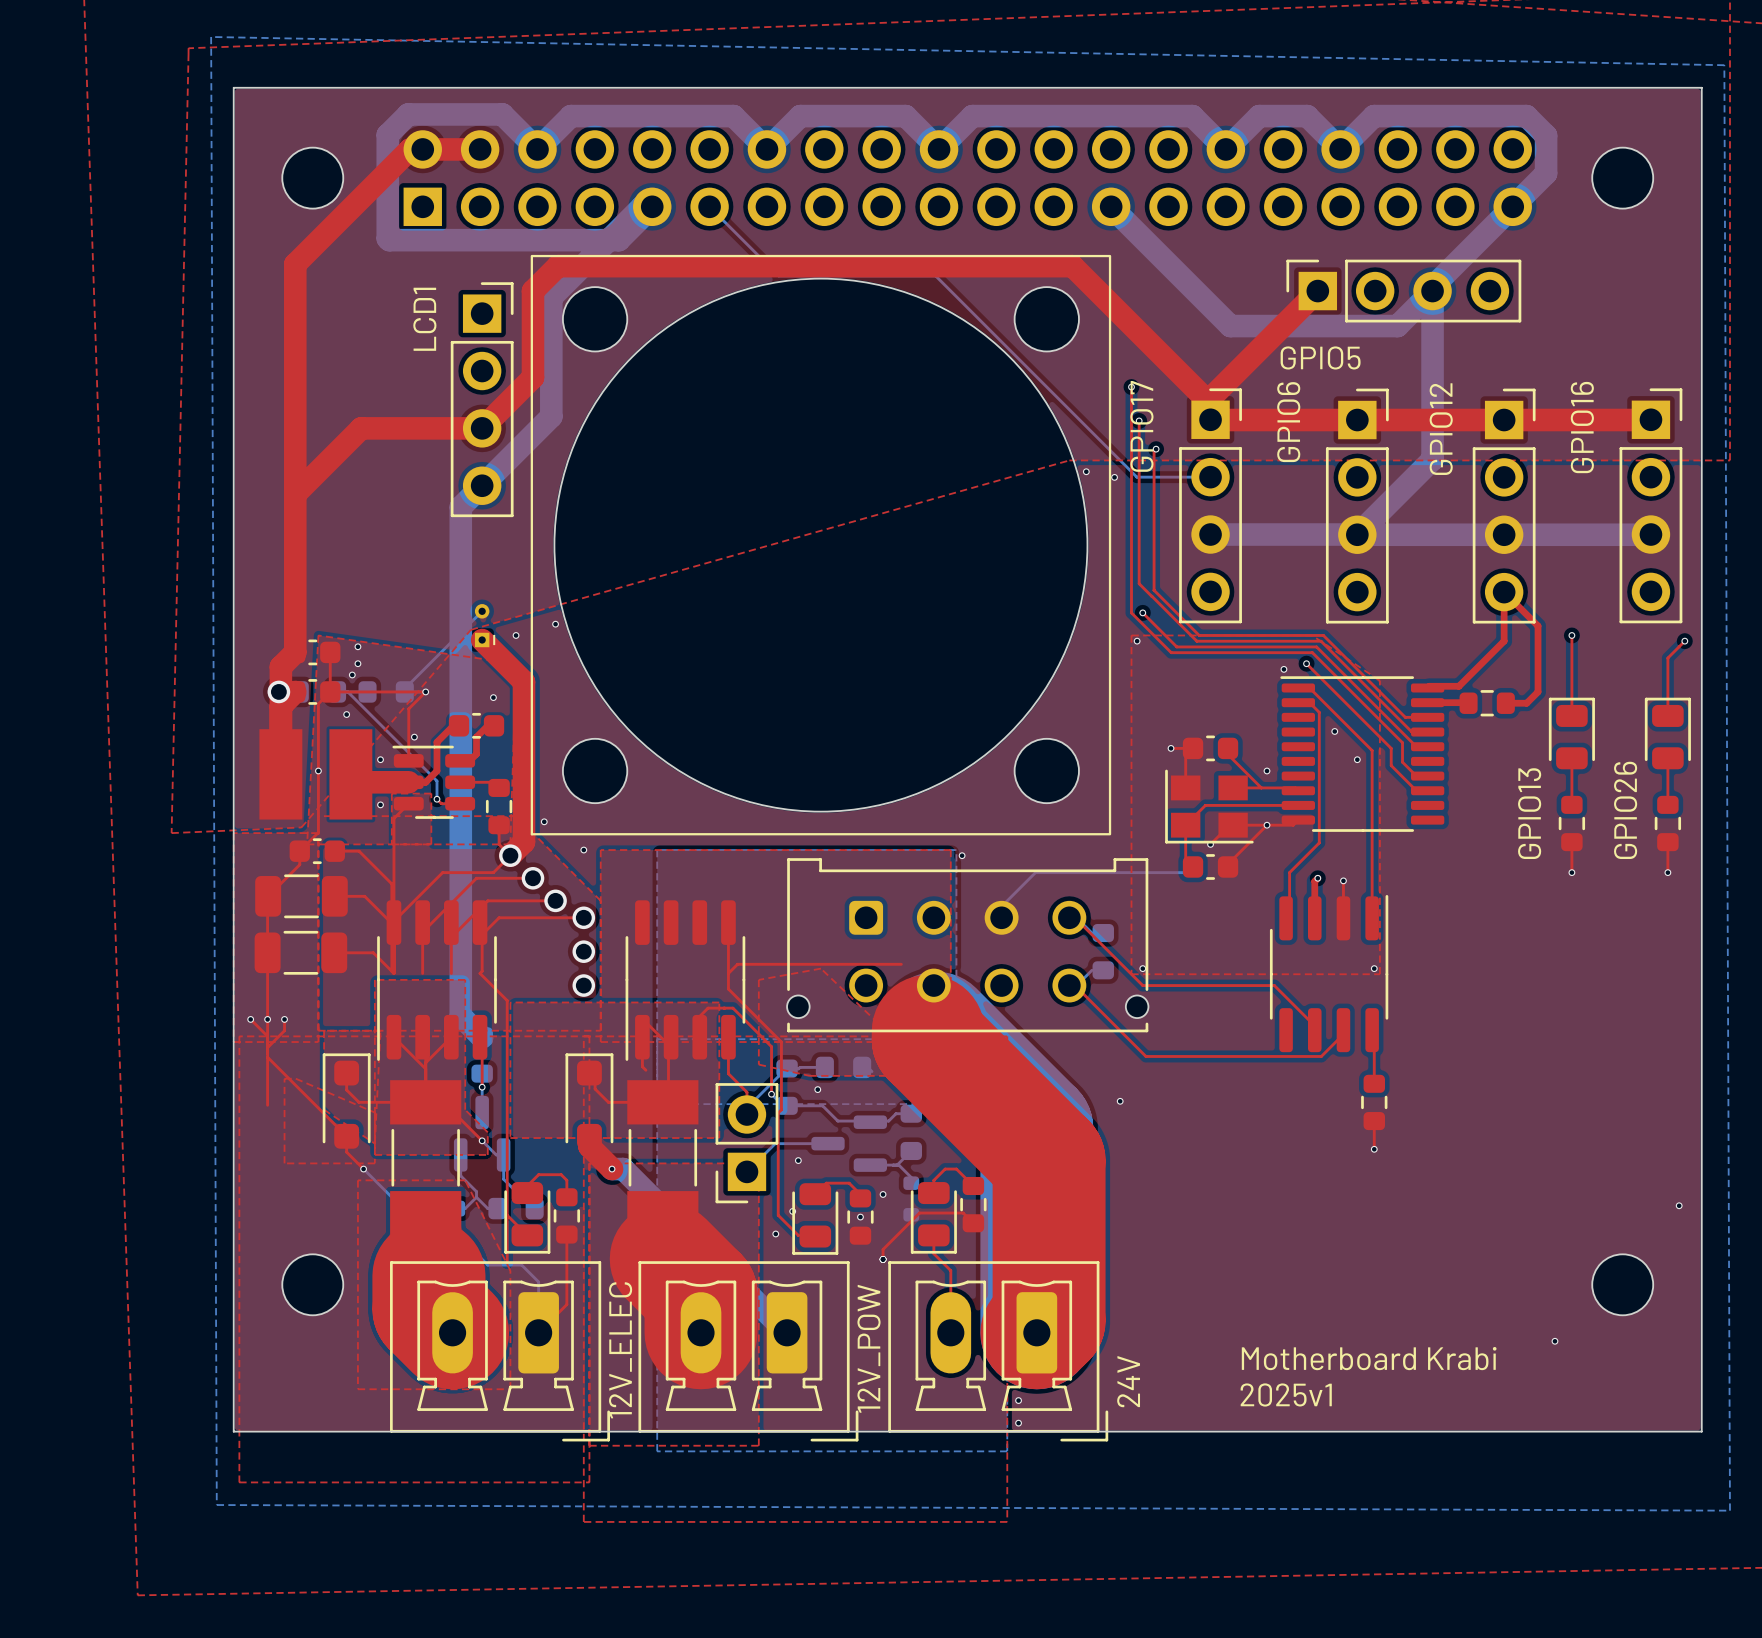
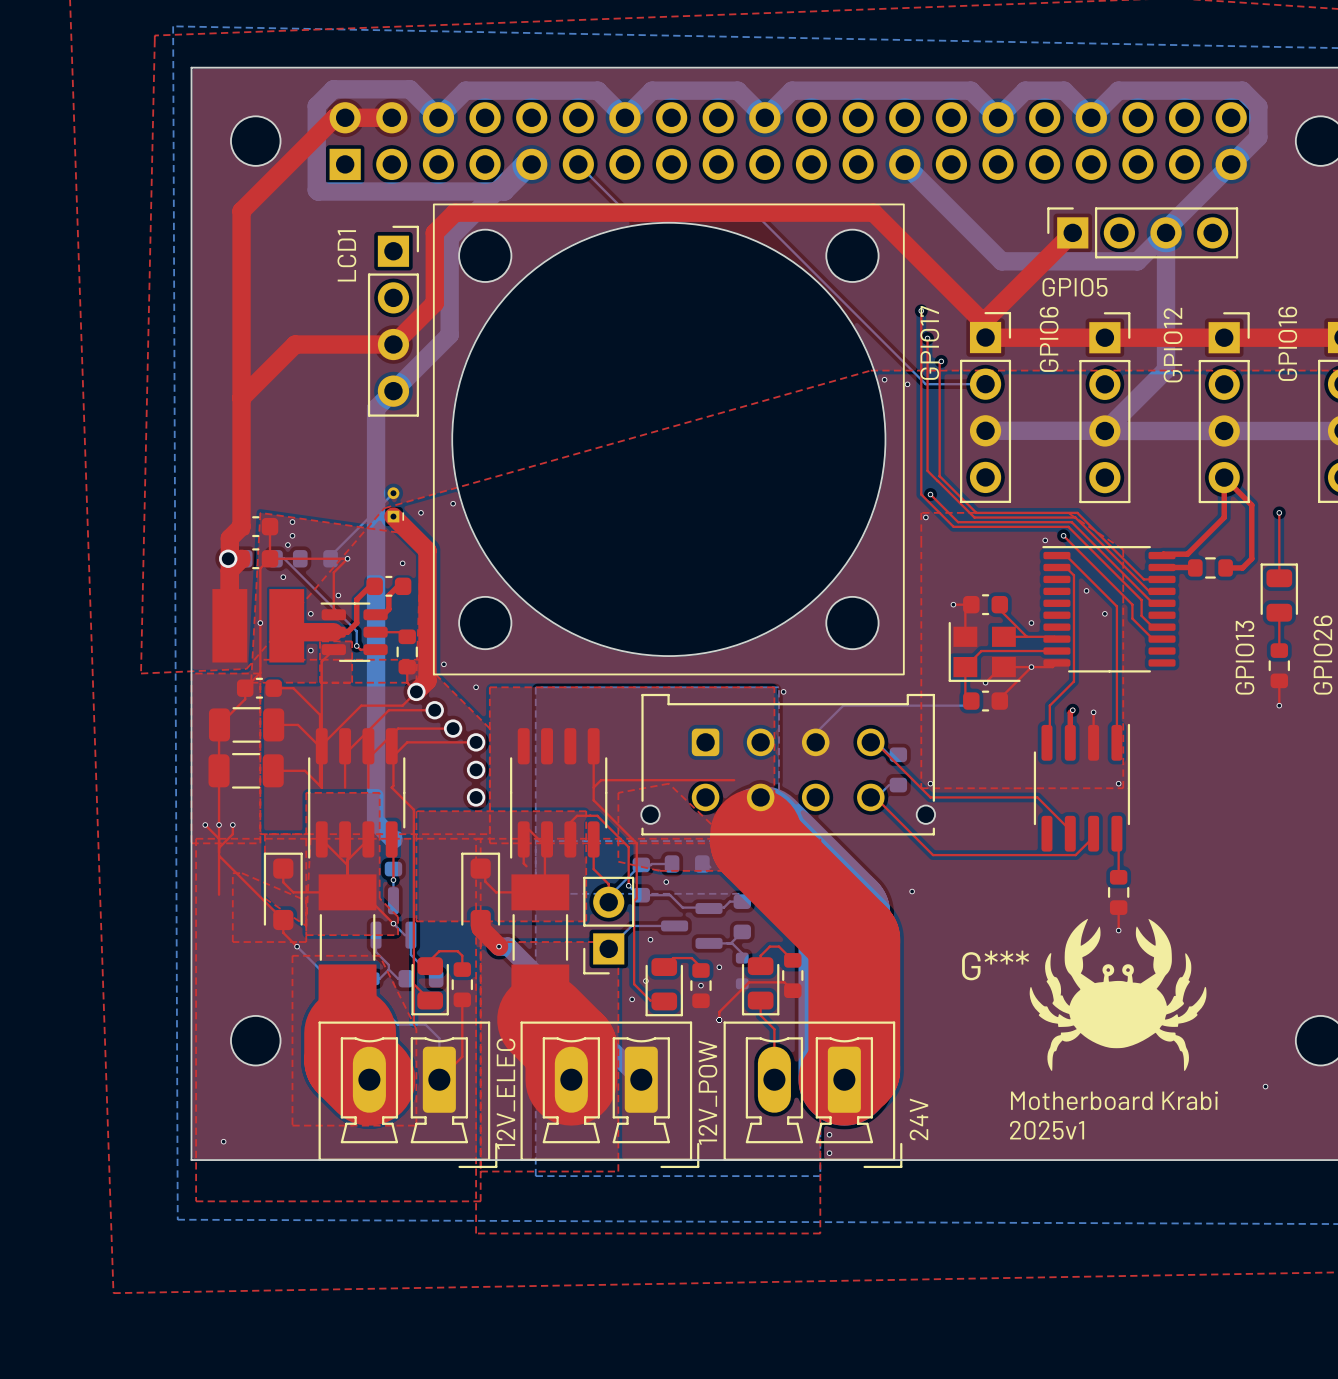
G***: none -> (1118, 994)
via: none -> (223, 1141)

